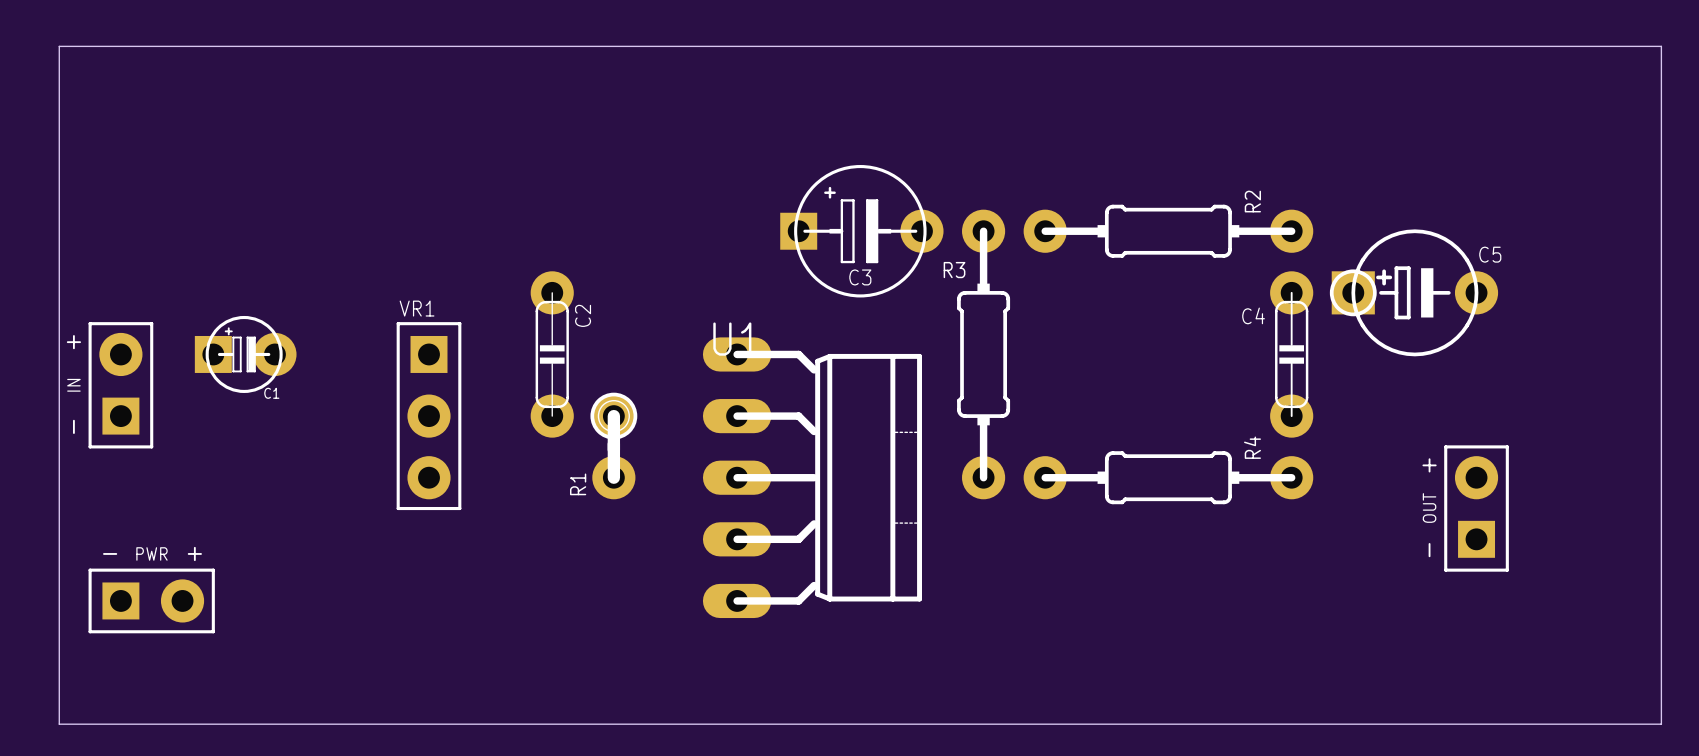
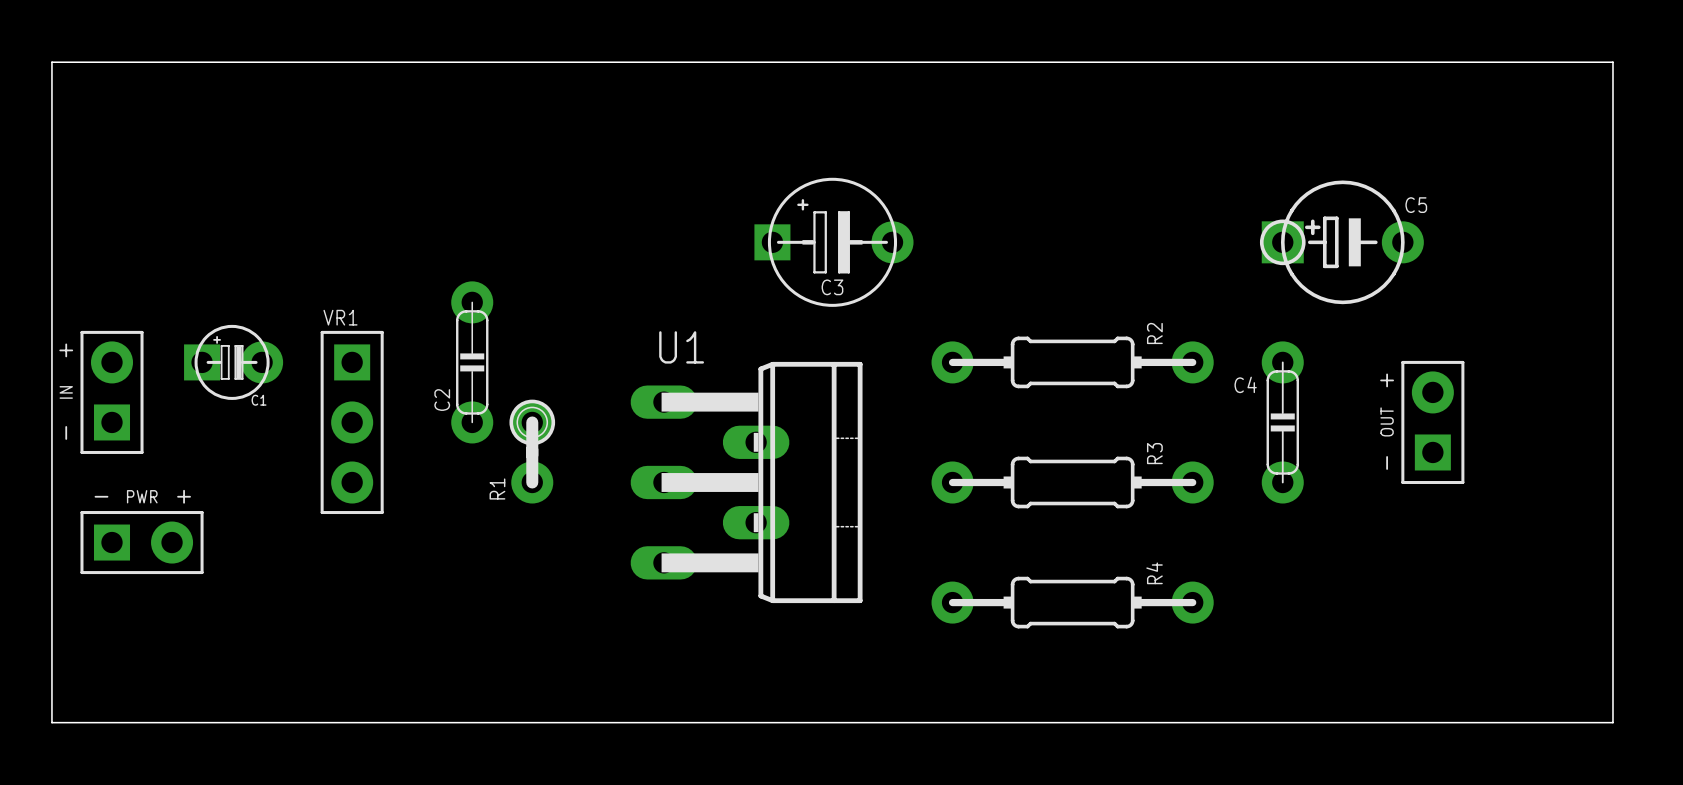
R2 position: (1168, 231) -> (1072, 362)
C5 position: (1413, 292) -> (1341, 242)
C2 name position: C2 (583, 315) -> C2 (442, 400)
U1 footprint: [702, 337, 922, 619] -> [630, 361, 863, 604]
C2 position: (552, 354) -> (472, 362)
R3 rotation: 0° (983, 354) -> 90° clockwise (1072, 482)
R3 position: (983, 354) -> (1072, 482)
C4 position: (1291, 354) -> (1282, 422)
VR1 position: (429, 416) -> (352, 422)
R1 position: (613, 445) -> (532, 451)
R4 position: (1168, 477) -> (1072, 602)
OUT position: (1465, 508) -> (1422, 422)
PWR position: (151, 590) -> (142, 531)

